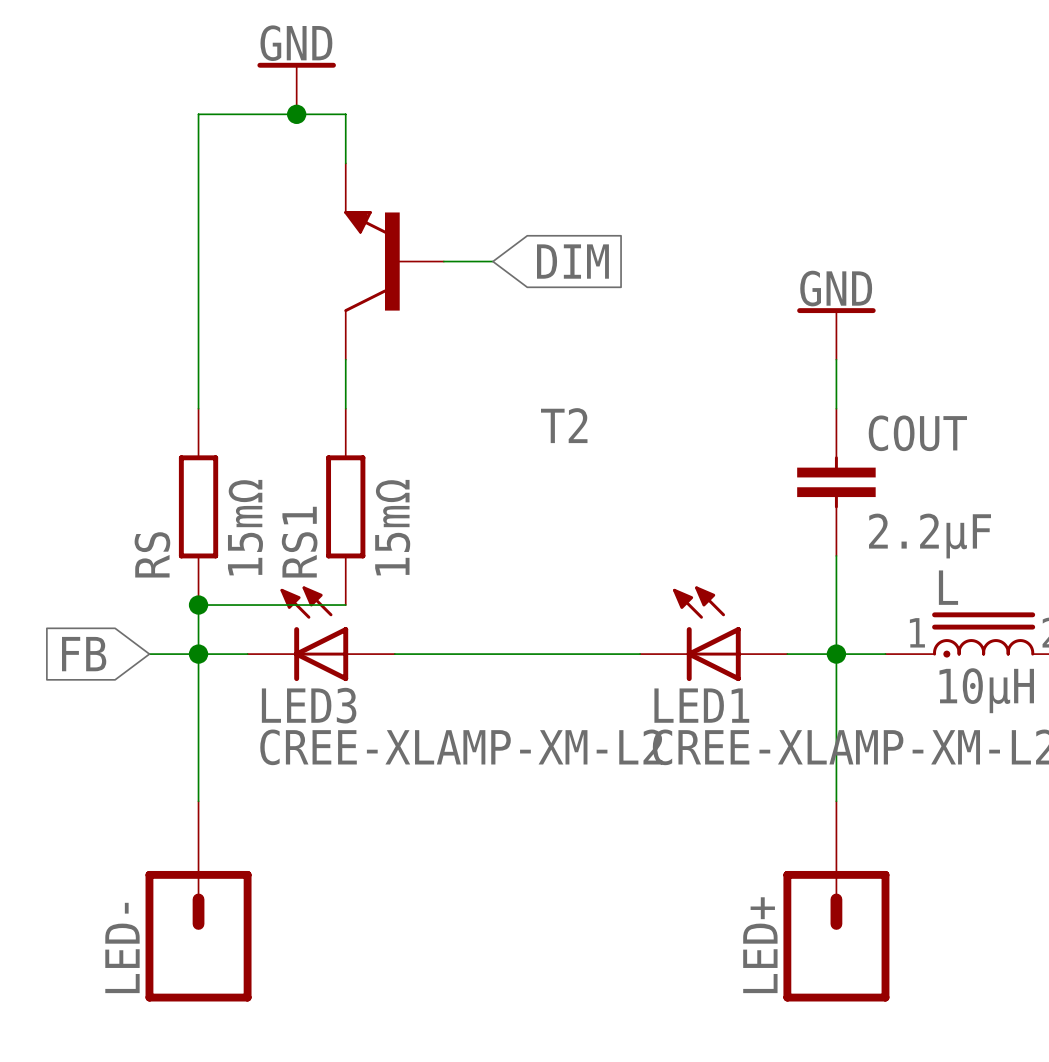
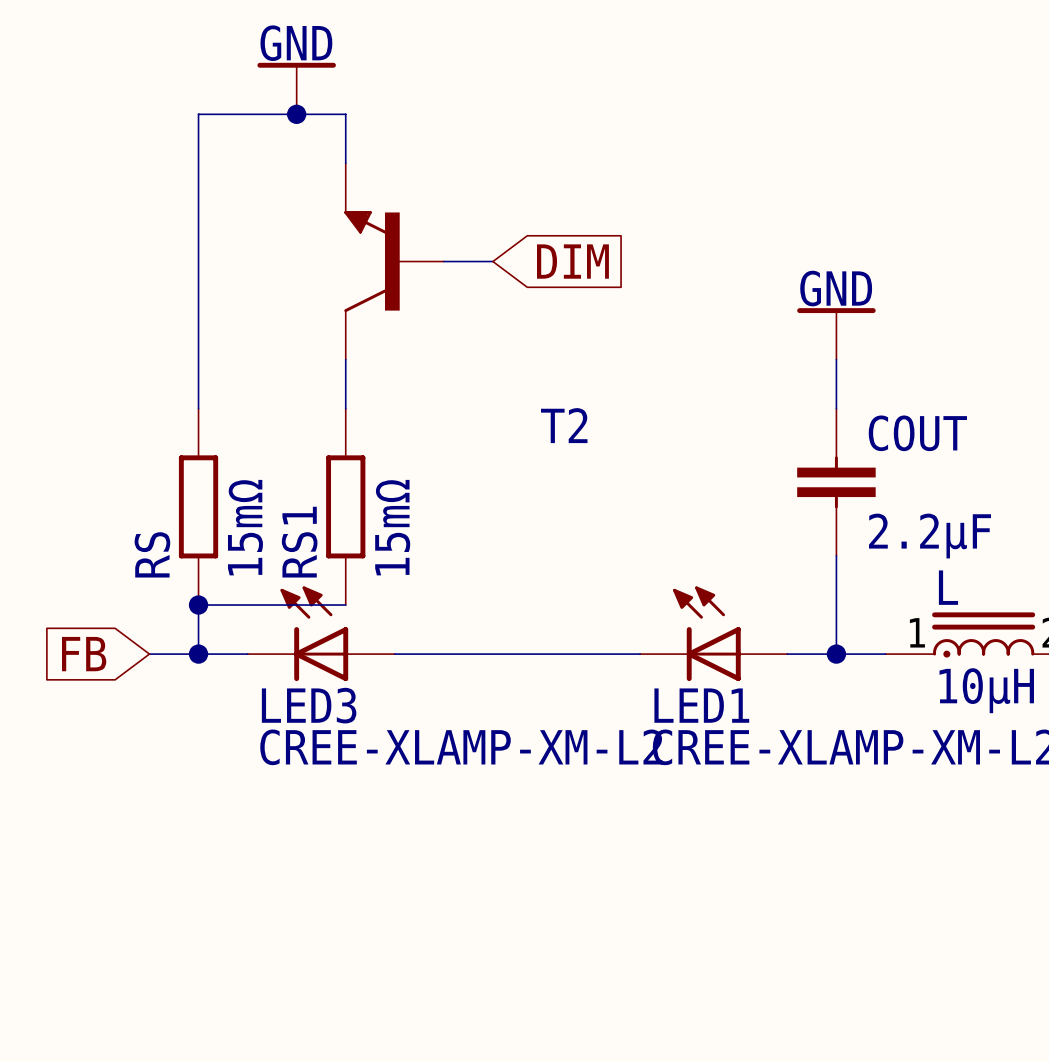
wire: (198, 654) (198, 801) -> none
wire: (836, 654) (836, 801) -> none
LED-: (198, 901) -> none
LED+: (836, 901) -> none

